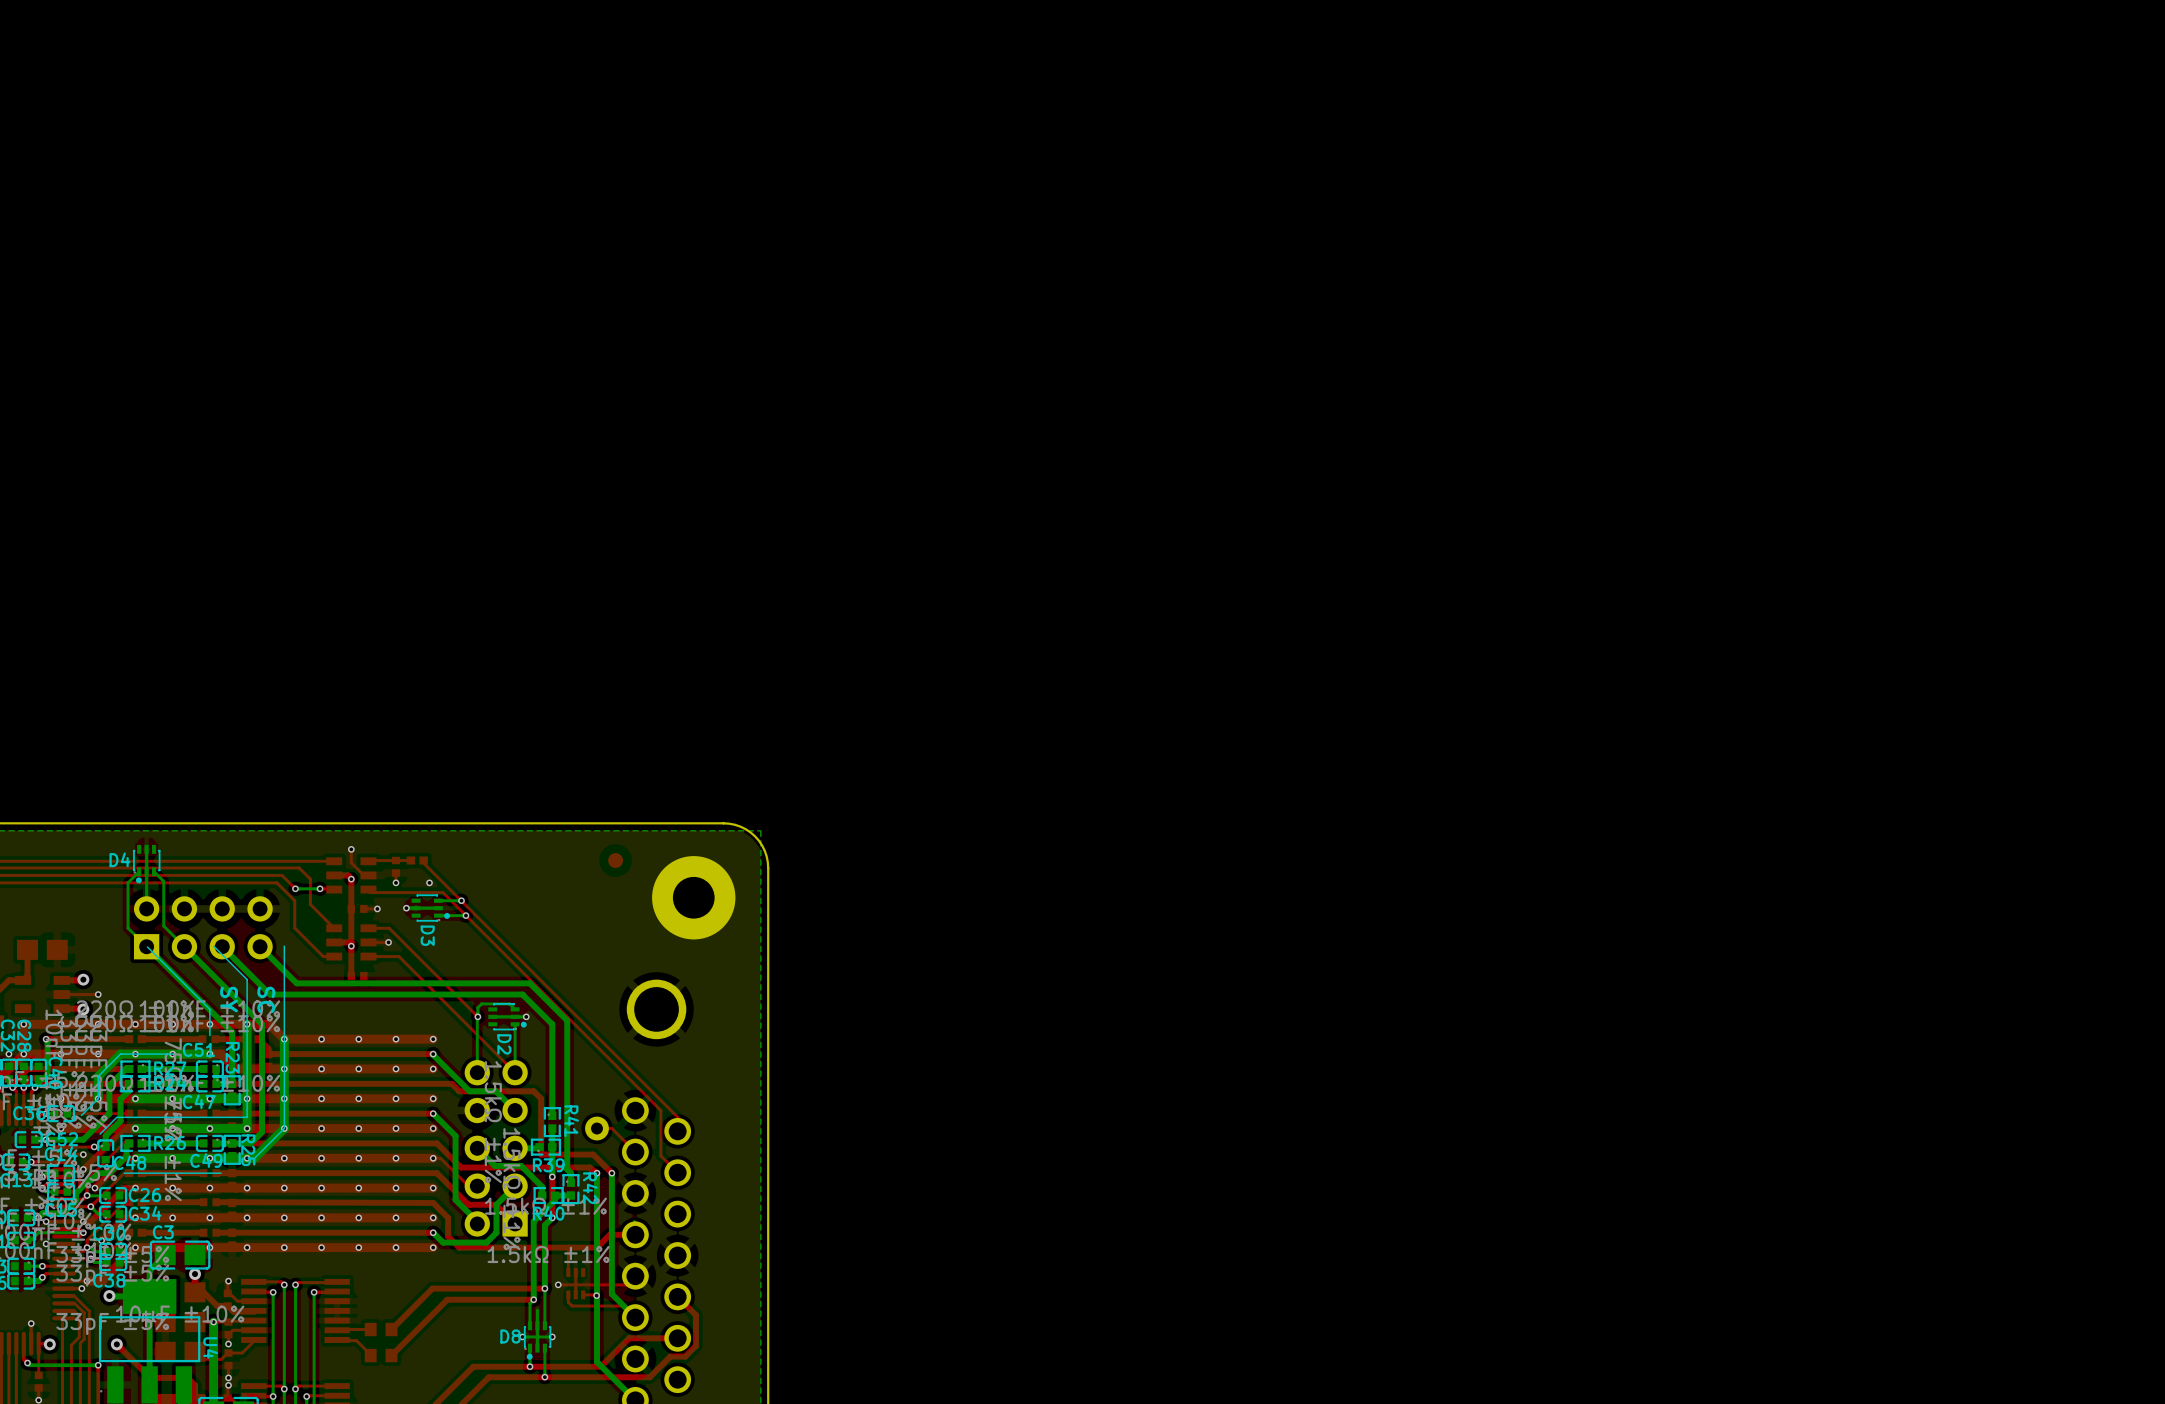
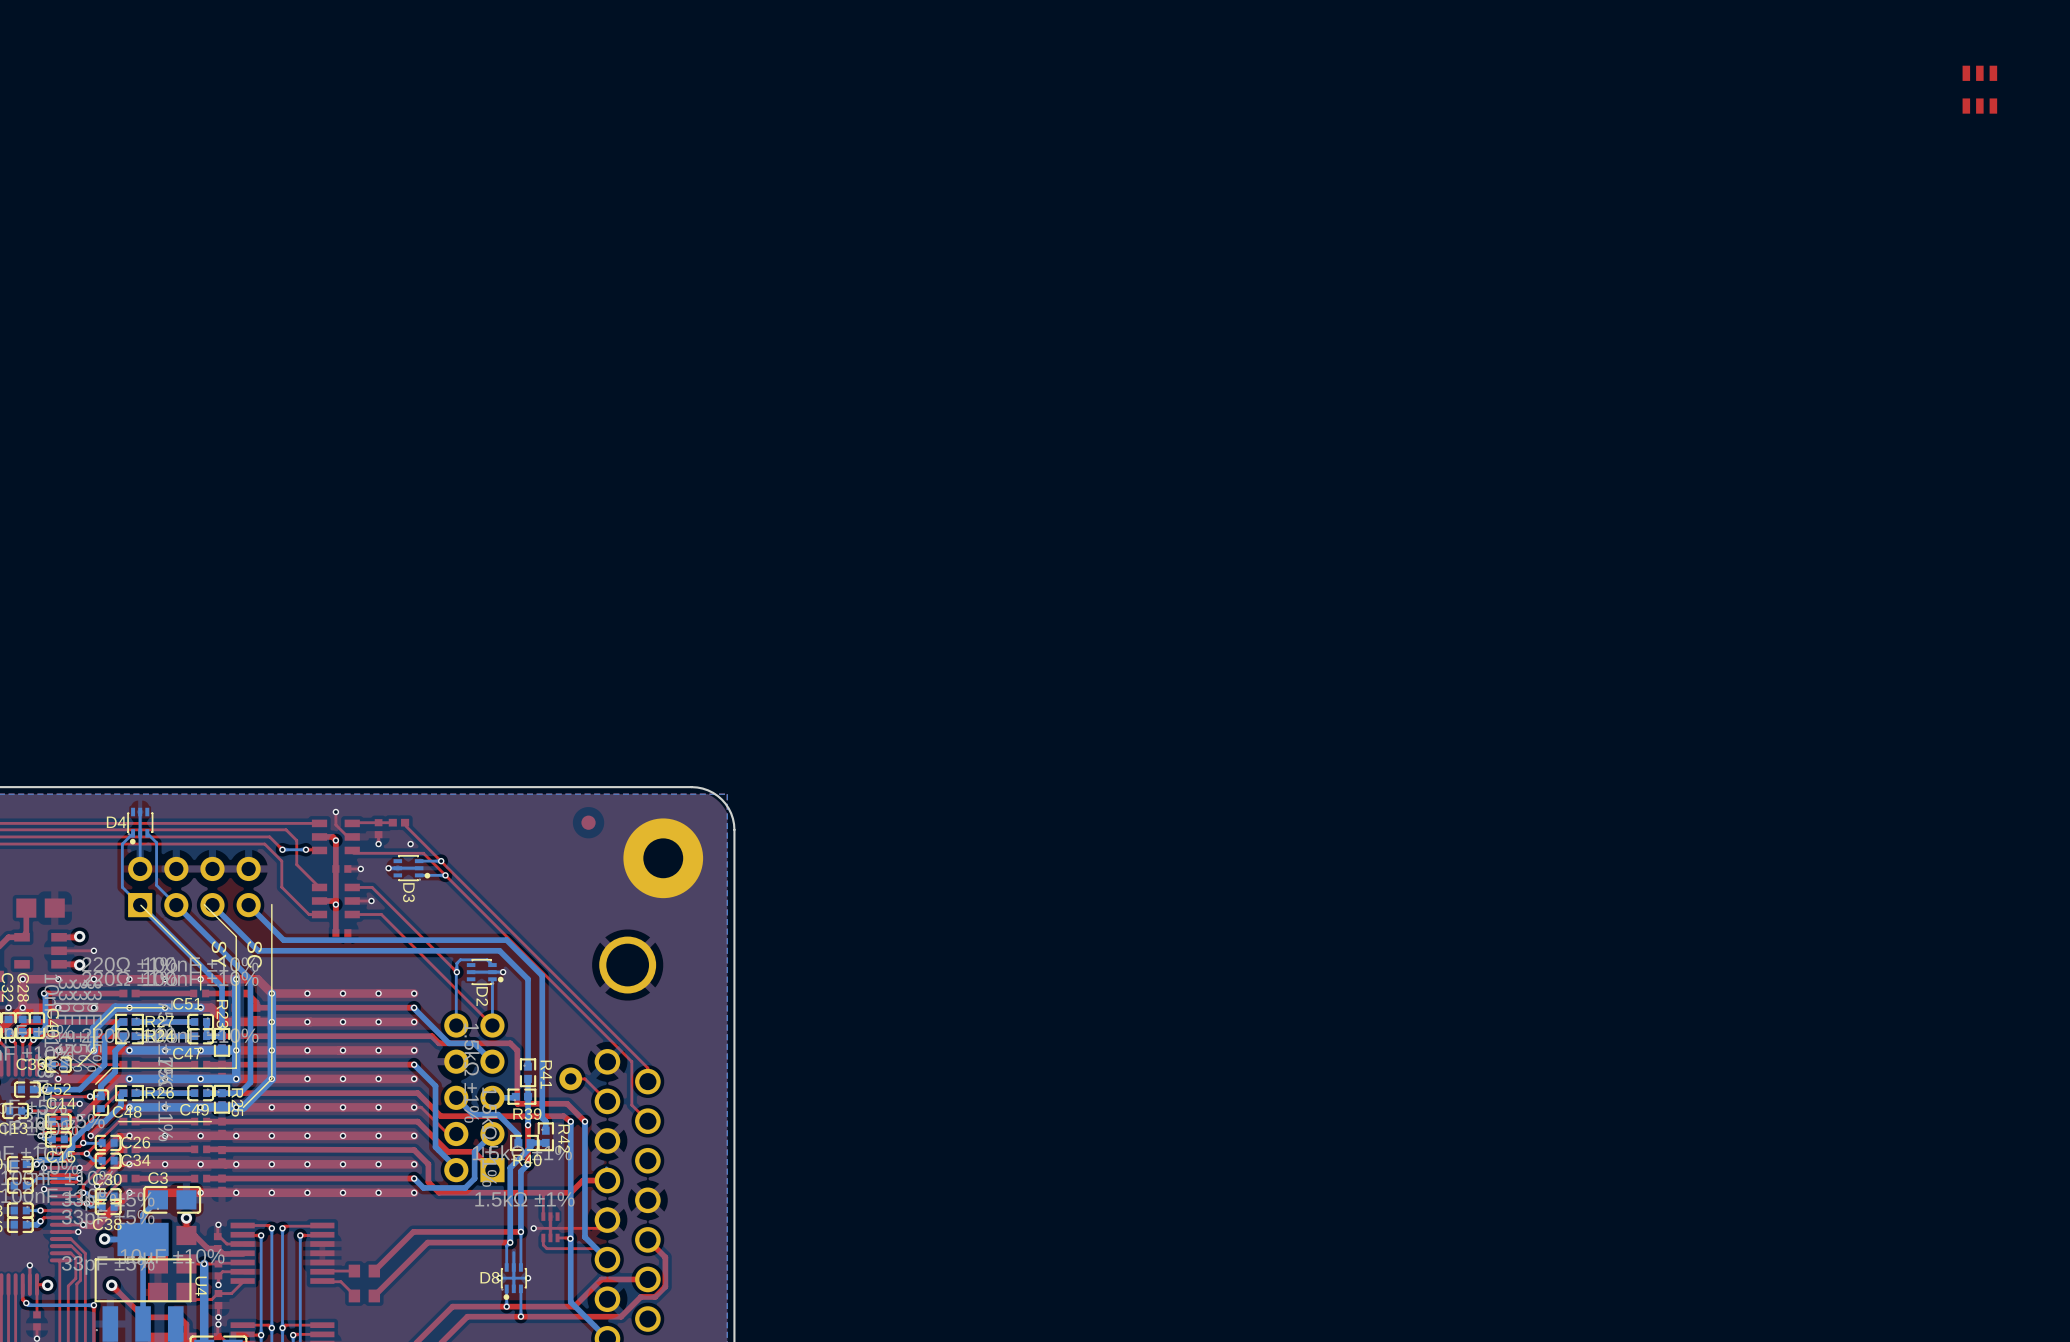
part: none -> (1979, 89)

